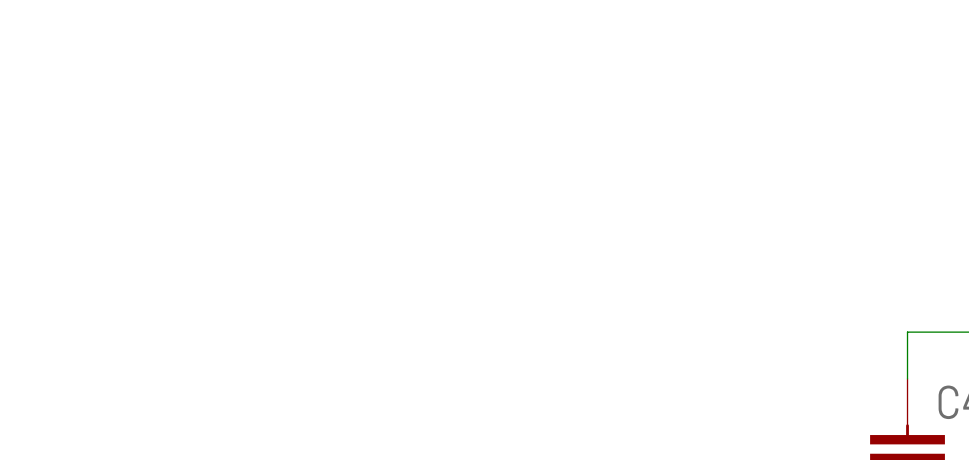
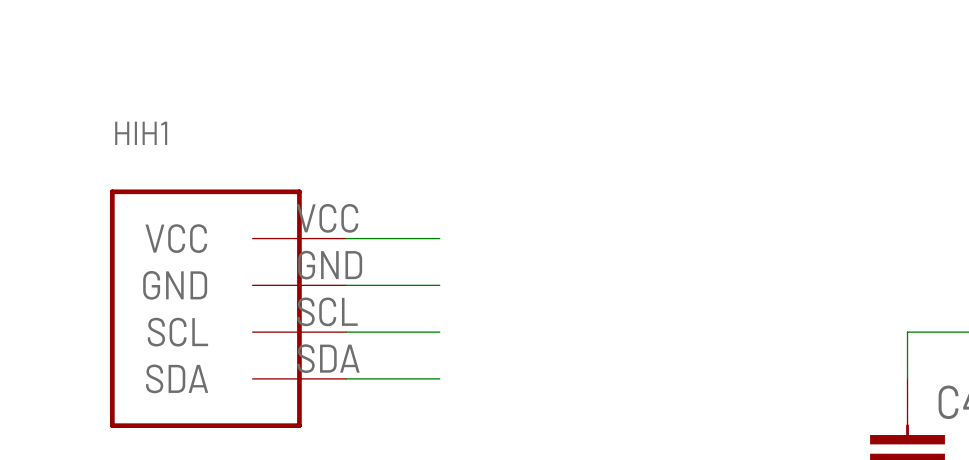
wire: none -> (346, 238) (439, 238)
wire: none -> (346, 285) (439, 285)
HIH1: none -> (228, 308)
wire: none -> (346, 332) (439, 332)
wire: none -> (346, 378) (439, 378)

